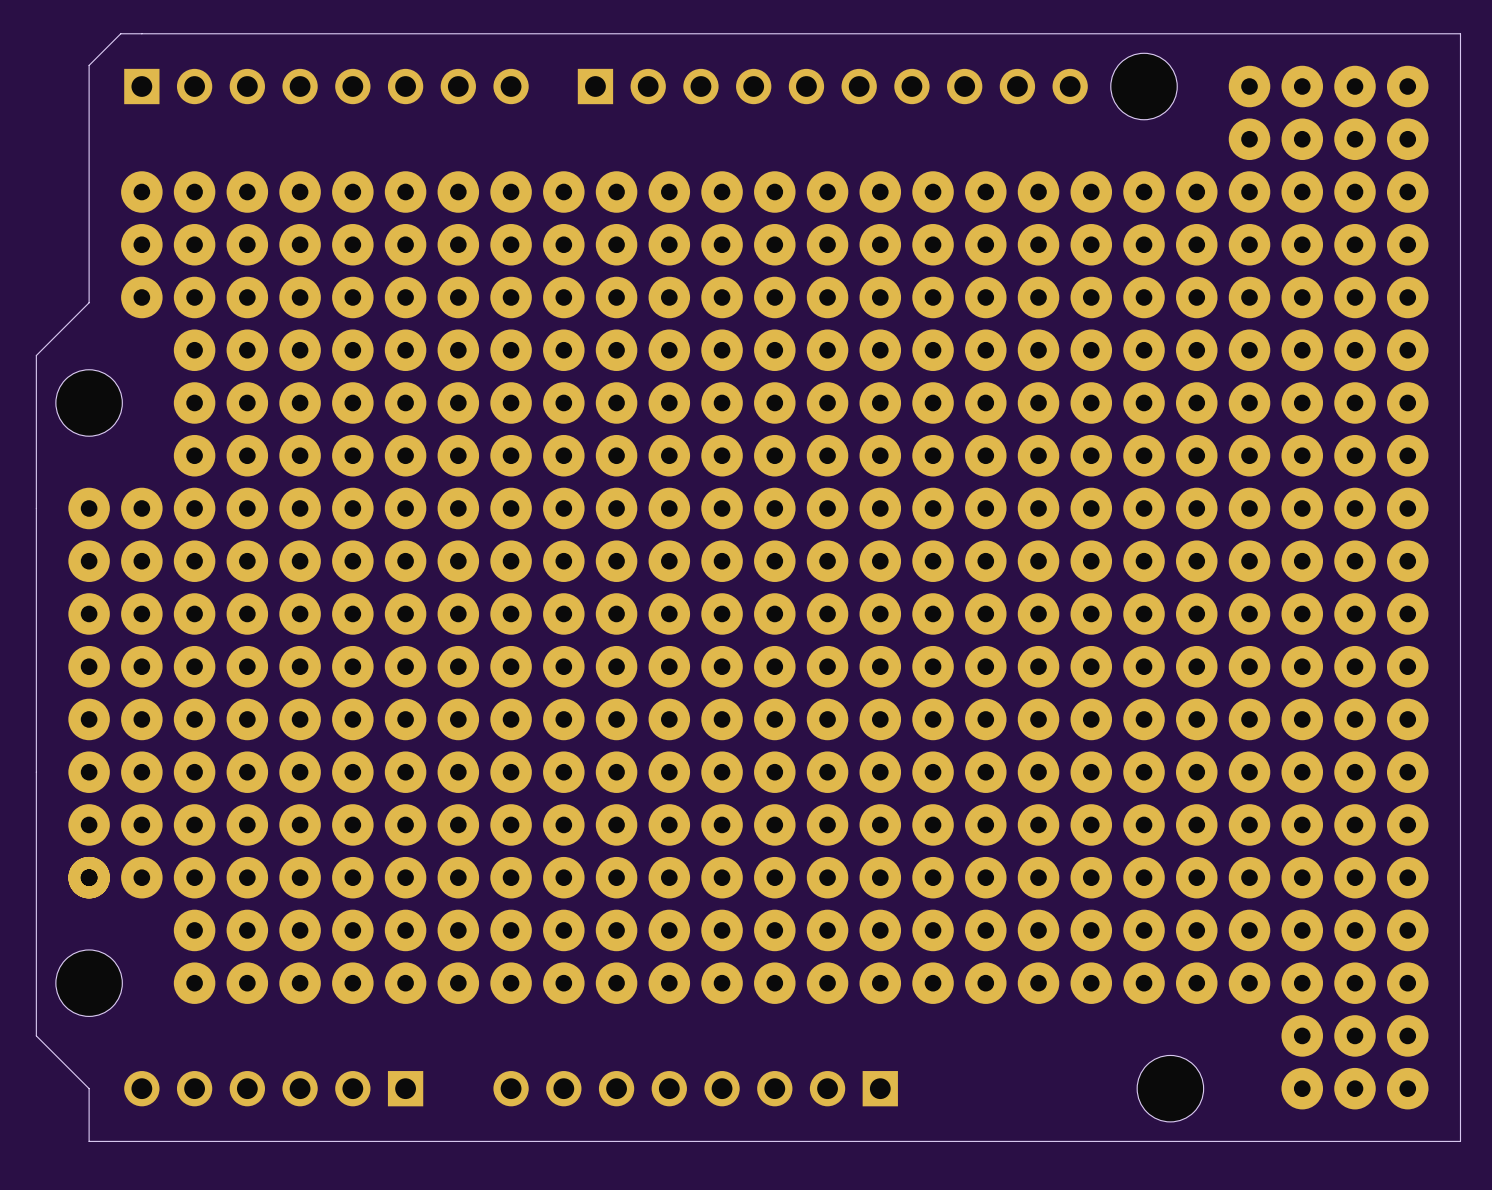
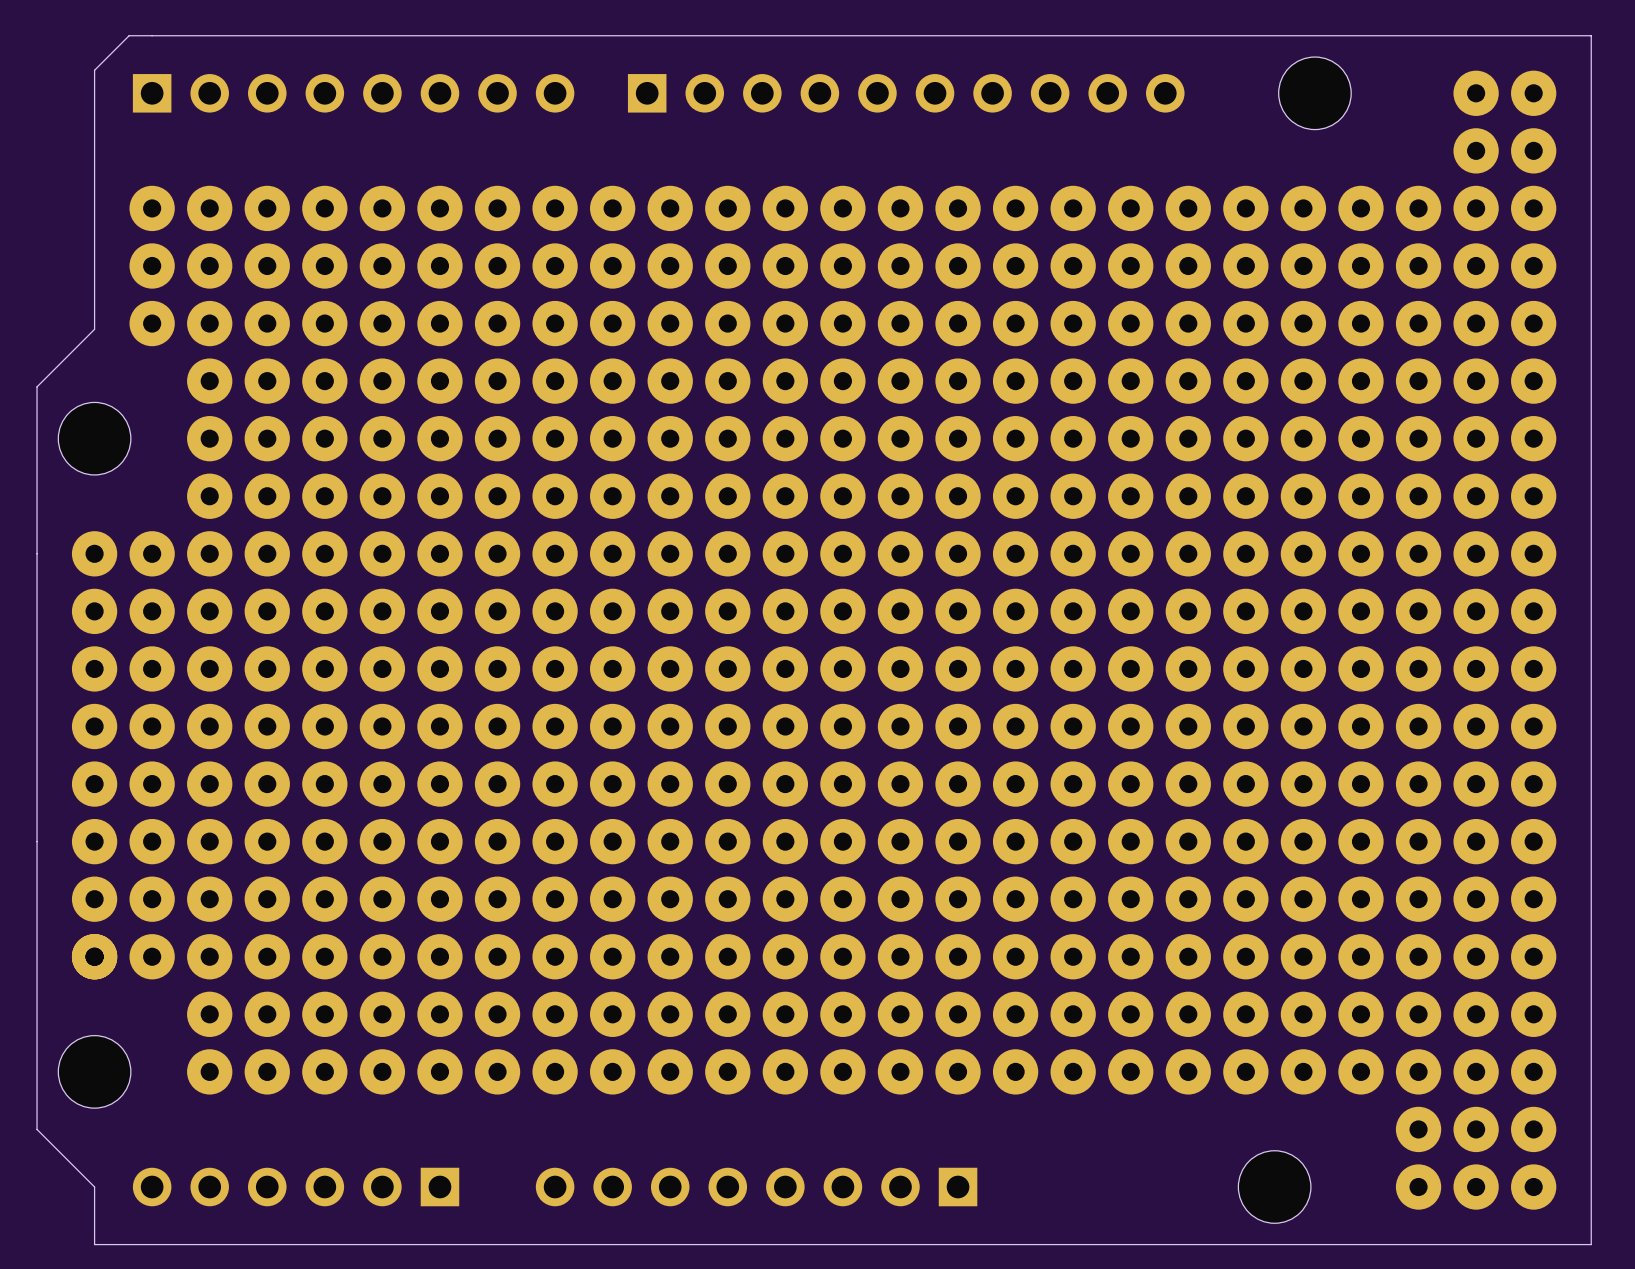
part position: (1144, 86) -> (1314, 93)
part: (1249, 86) -> none
part: (1302, 86) -> none
part: (1249, 139) -> none
part: (1302, 139) -> none

